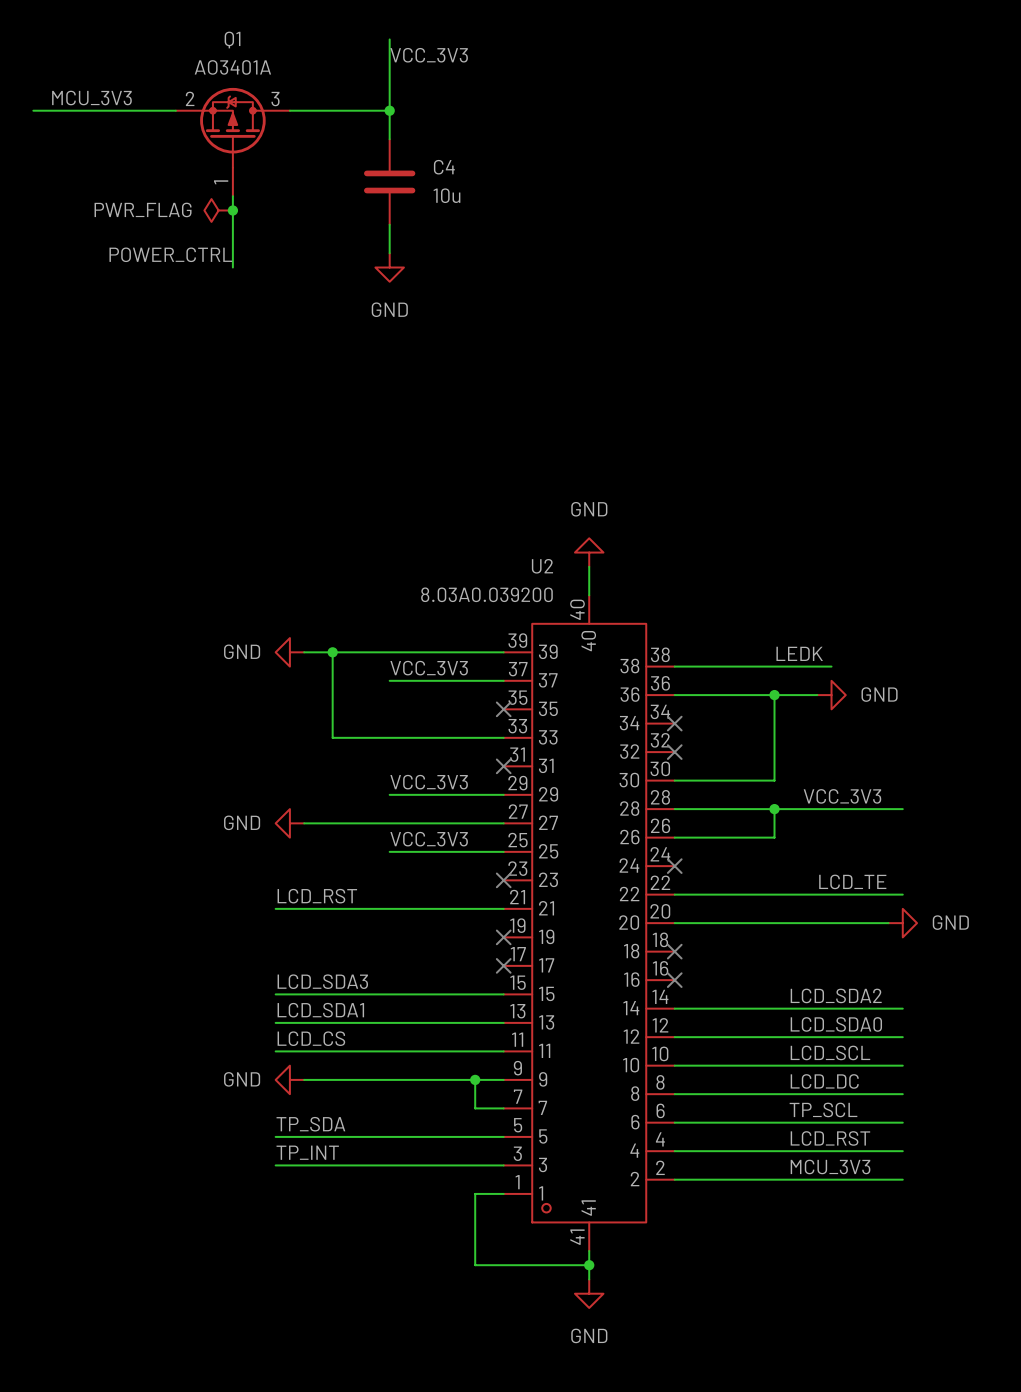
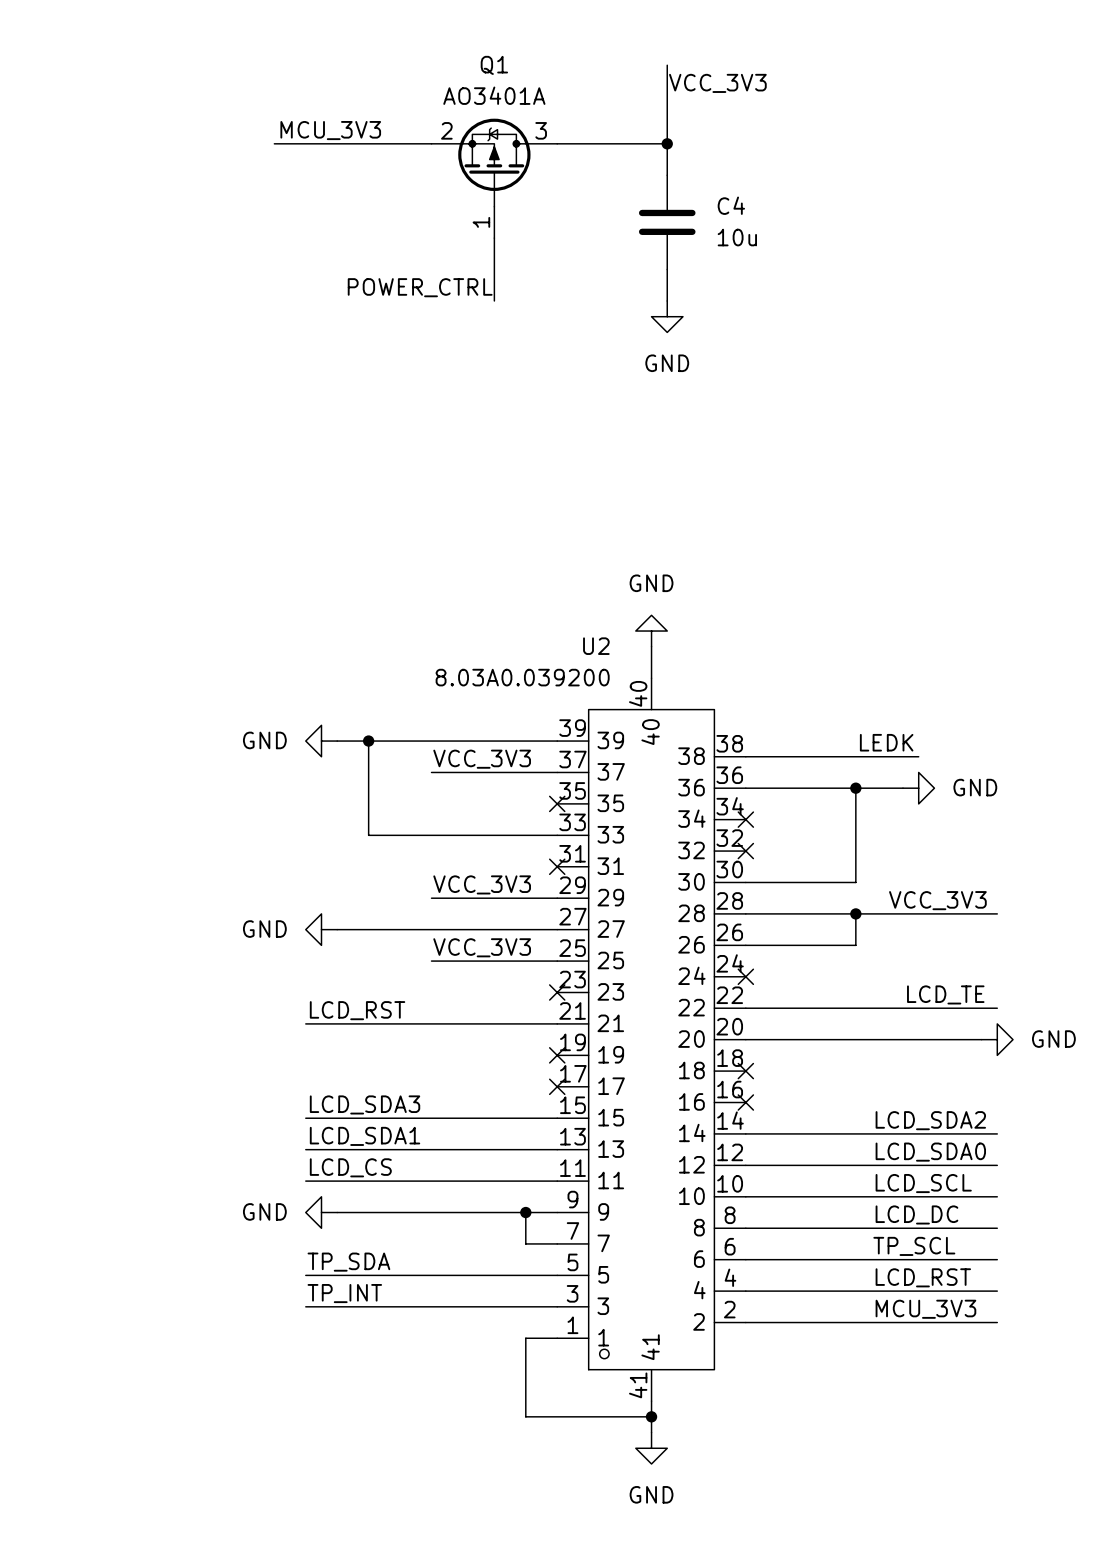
wire: (389, 39) (389, 139) -> (667, 65) (667, 175)
label position: VCC_3V3 (429, 55) -> VCC_3V3 (717, 83)
label position: MCU_3V3 (91, 98) -> MCU_3V3 (330, 130)
wire: (33, 110) (175, 110) -> none
junction: (389, 110) -> none
wire: none -> (557, 143) (667, 143)
junction: none -> (667, 143)
Q1 position: (232, 142) -> (494, 178)
C4 position: (389, 181) -> (667, 222)
wire: (232, 196) (232, 267) -> none
wire: none -> (494, 238) (494, 300)
power symbol: PWR_FLAG (218, 210) -> none
junction: (232, 210) -> none
wire: (389, 224) (389, 253) -> (667, 269) (667, 300)
label position: POWER_CTRL (170, 254) -> POWER_CTRL (420, 287)
power symbol position: GND (389, 267) -> GND (667, 316)

